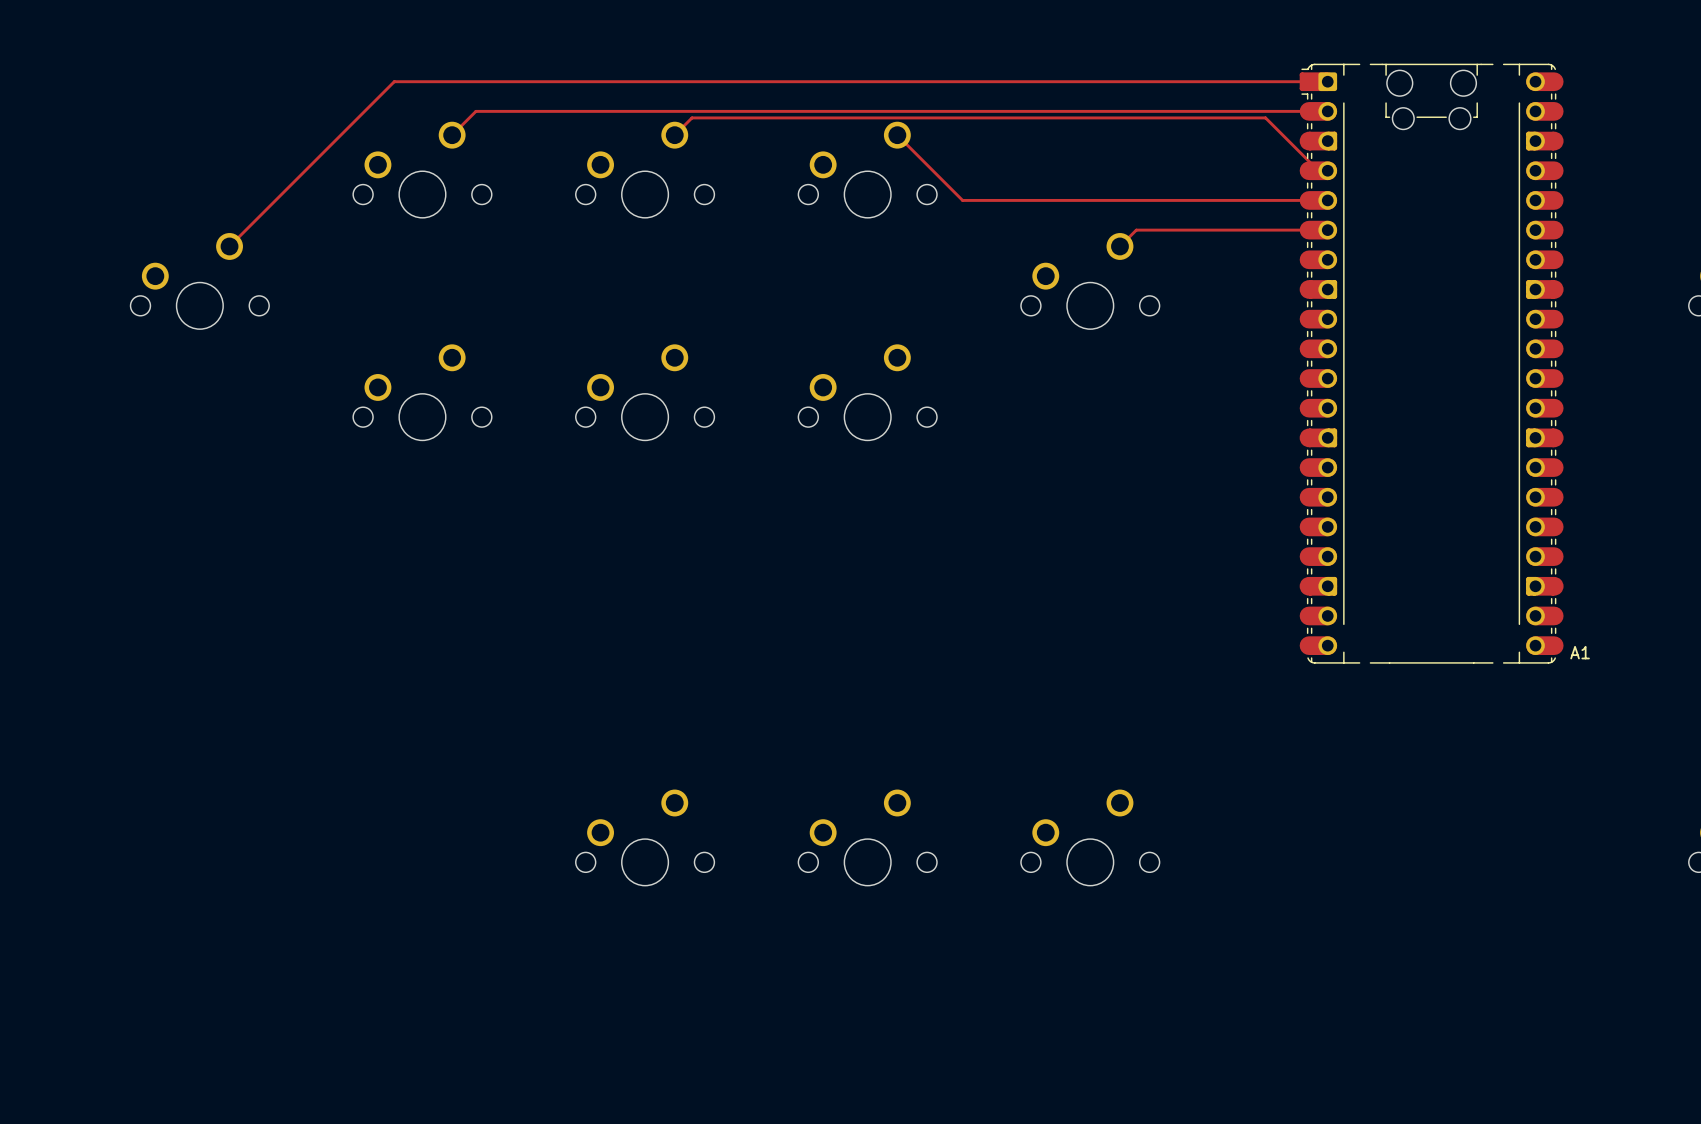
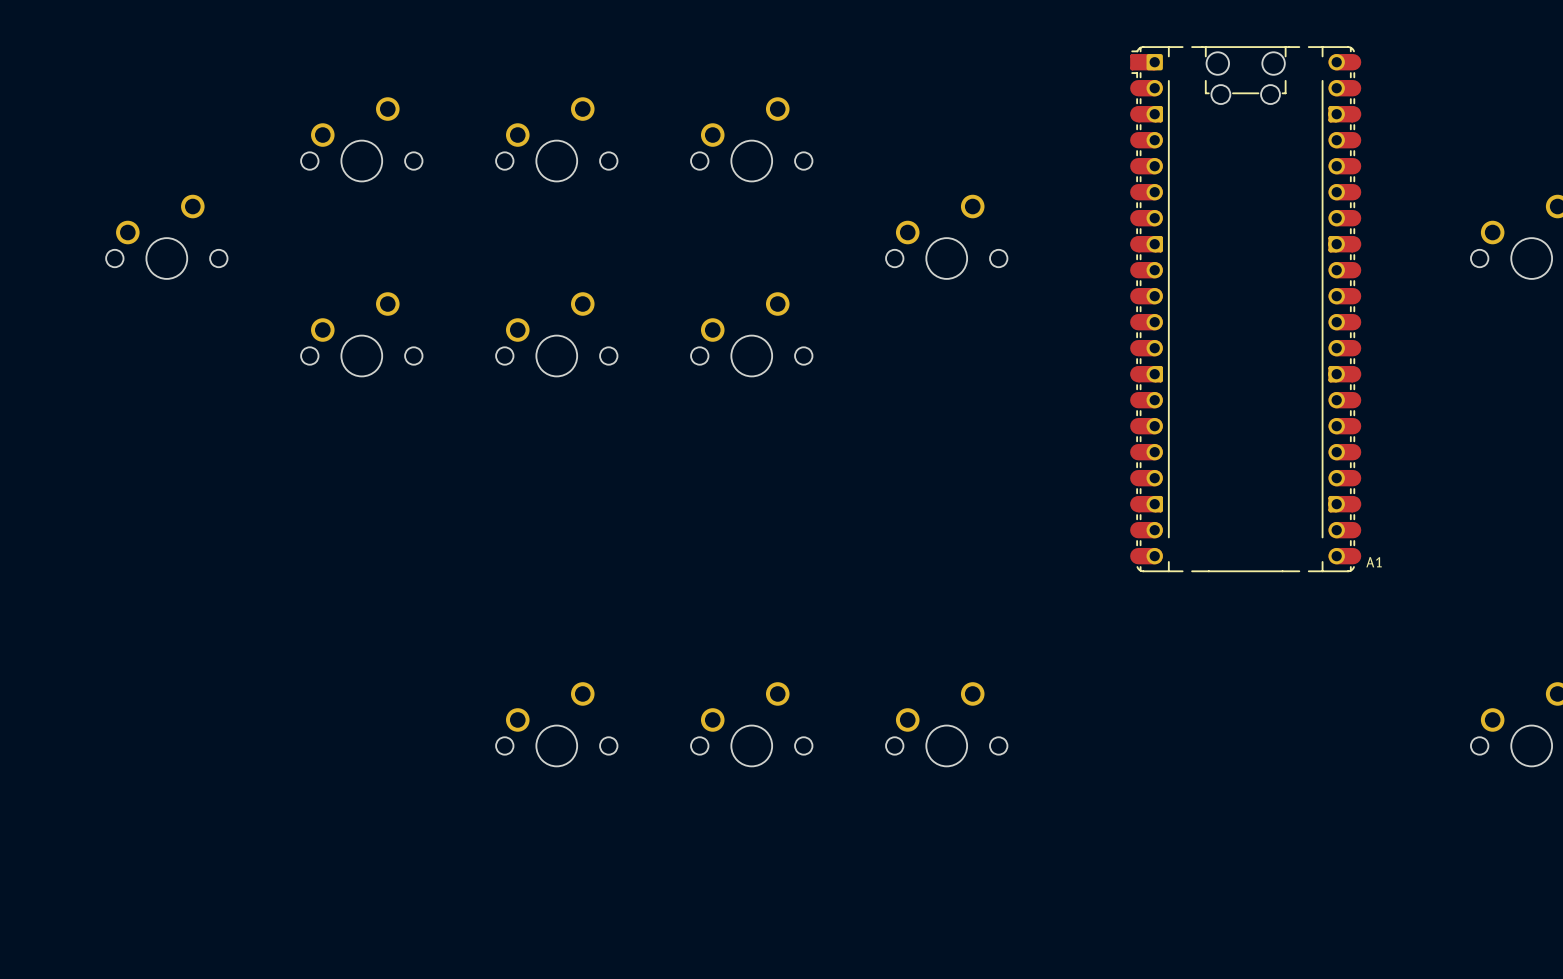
track: (1318, 81) (394, 81) (229, 246) -> none
track: (1318, 111) (475, 111) (452, 135) -> none
track: (674, 135) (692, 117) (1265, 117) (1318, 170) -> none
track: (897, 135) (962, 200) (1318, 200) -> none
track: (1318, 230) (1136, 230) (1119, 246) -> none

